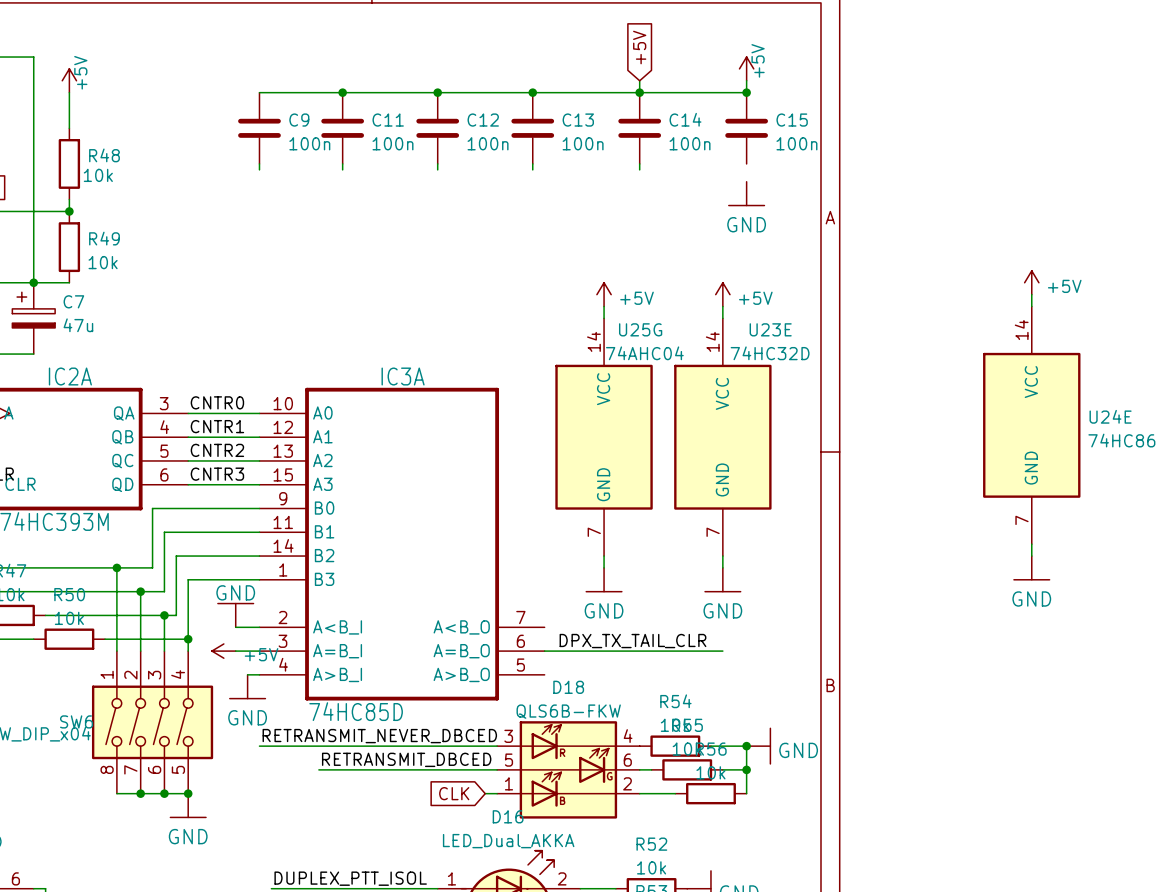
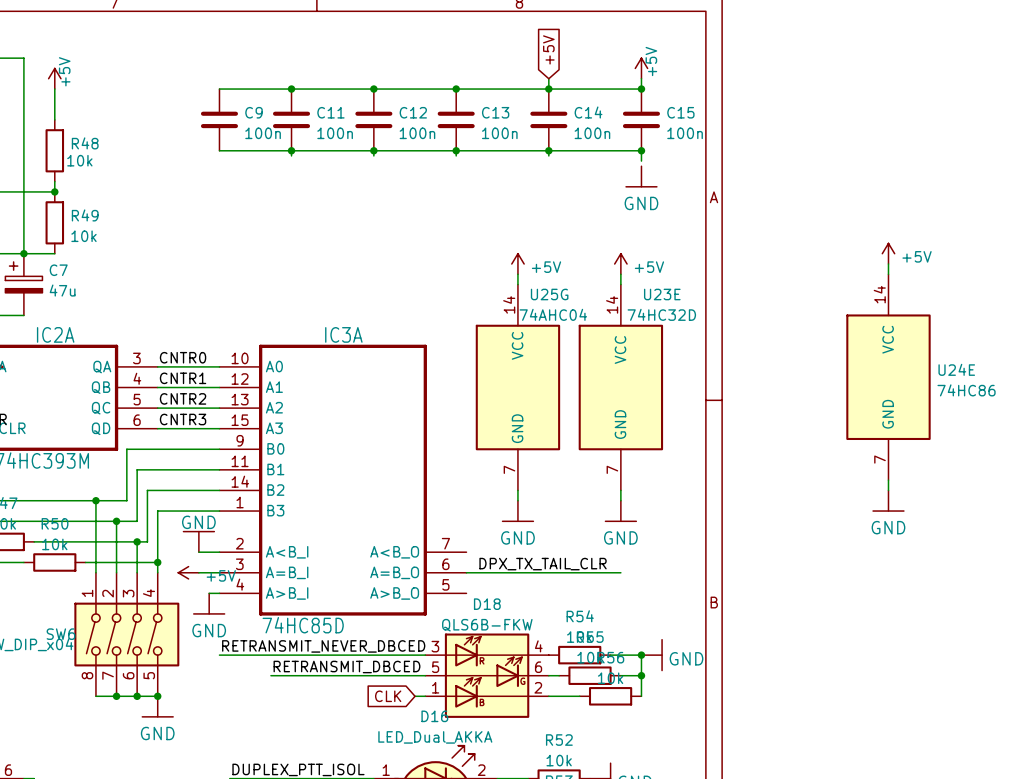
wire: (259, 163) (259, 169) -> (219, 150) (641, 150) (641, 161)
junction: none -> (291, 150)
junction: none -> (373, 150)
junction: none -> (456, 150)
junction: none -> (548, 150)
junction: none -> (641, 150)

